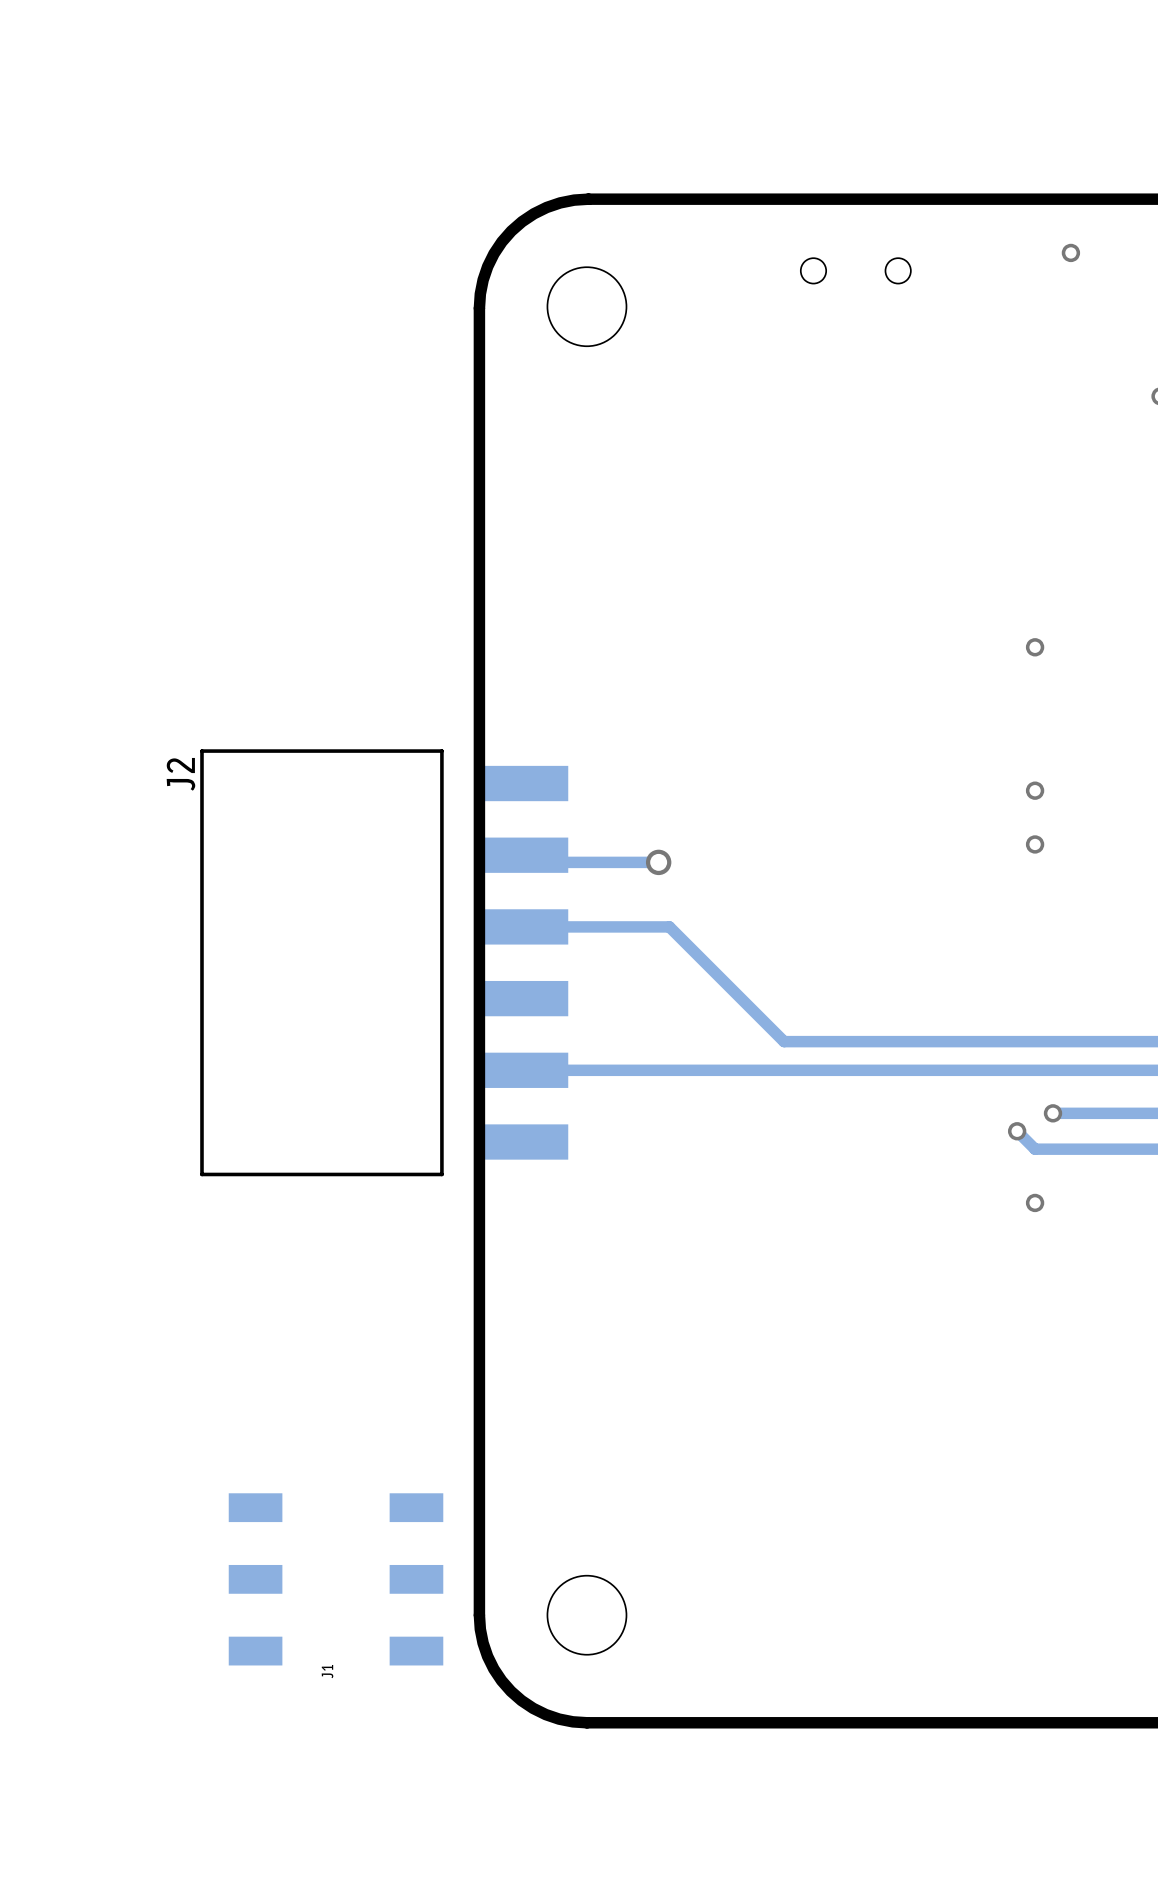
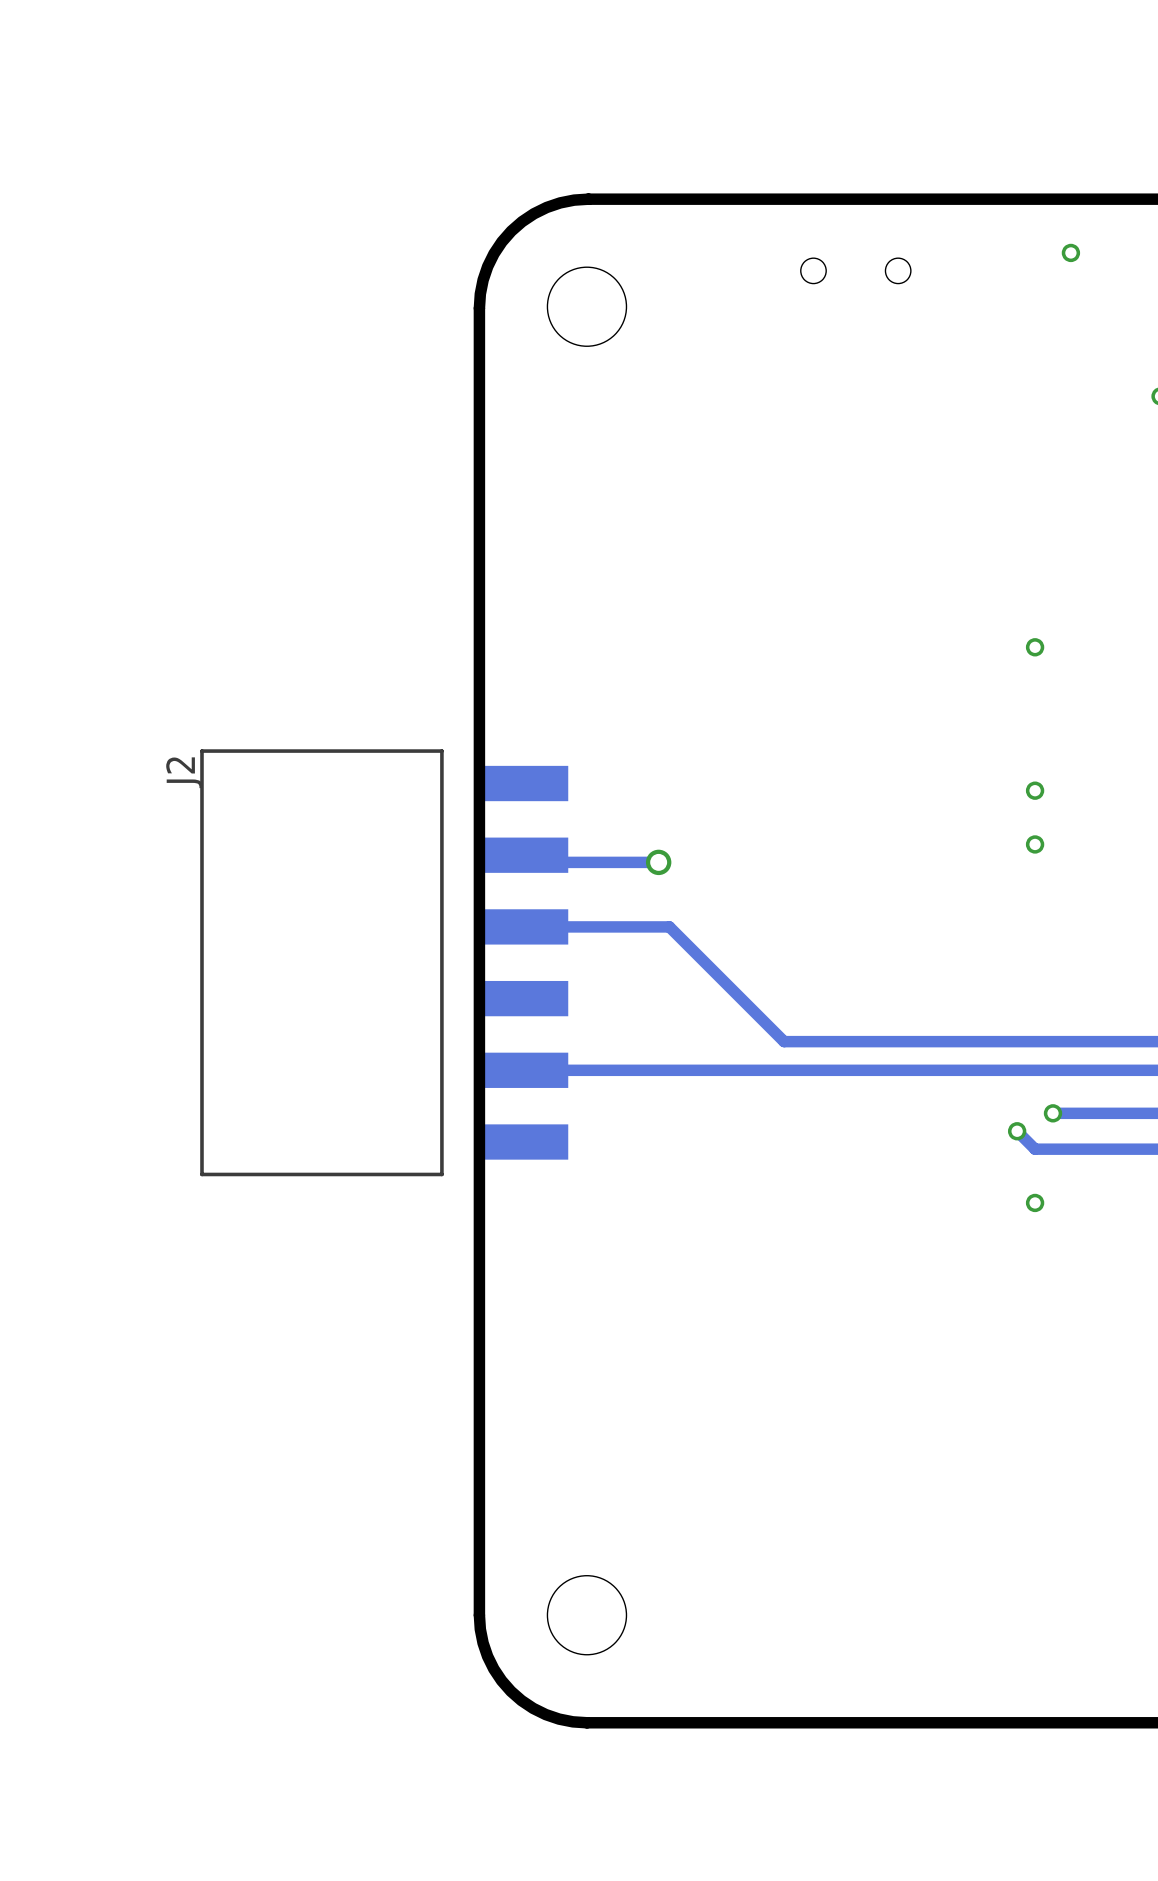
J1: (336, 1579) -> none

